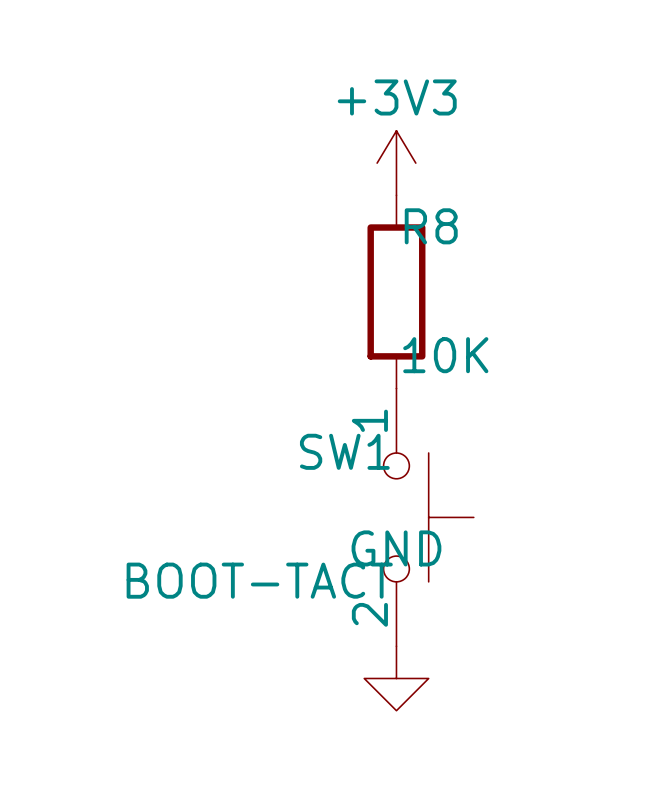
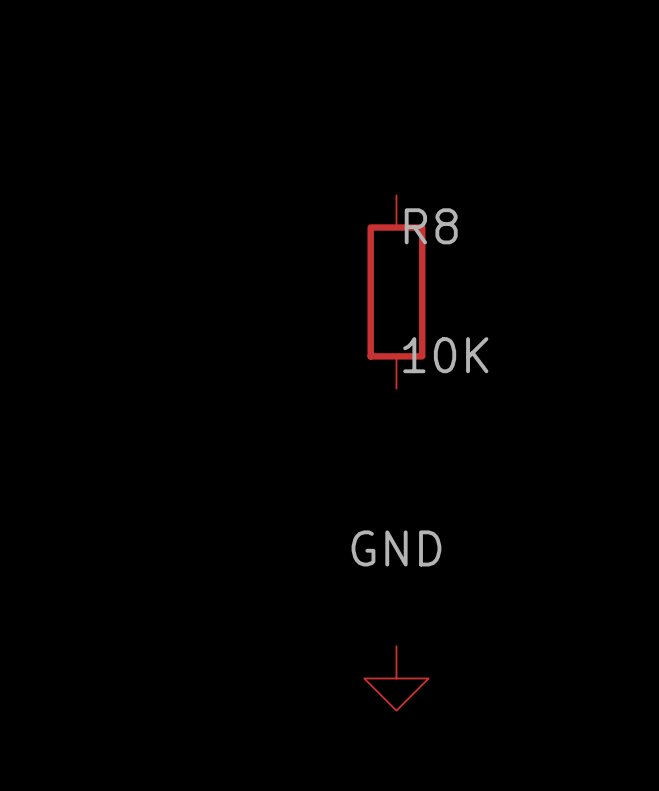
power symbol: +3V3 (396, 163) -> none
SW1: BOOT-TACT (428, 517) -> none

